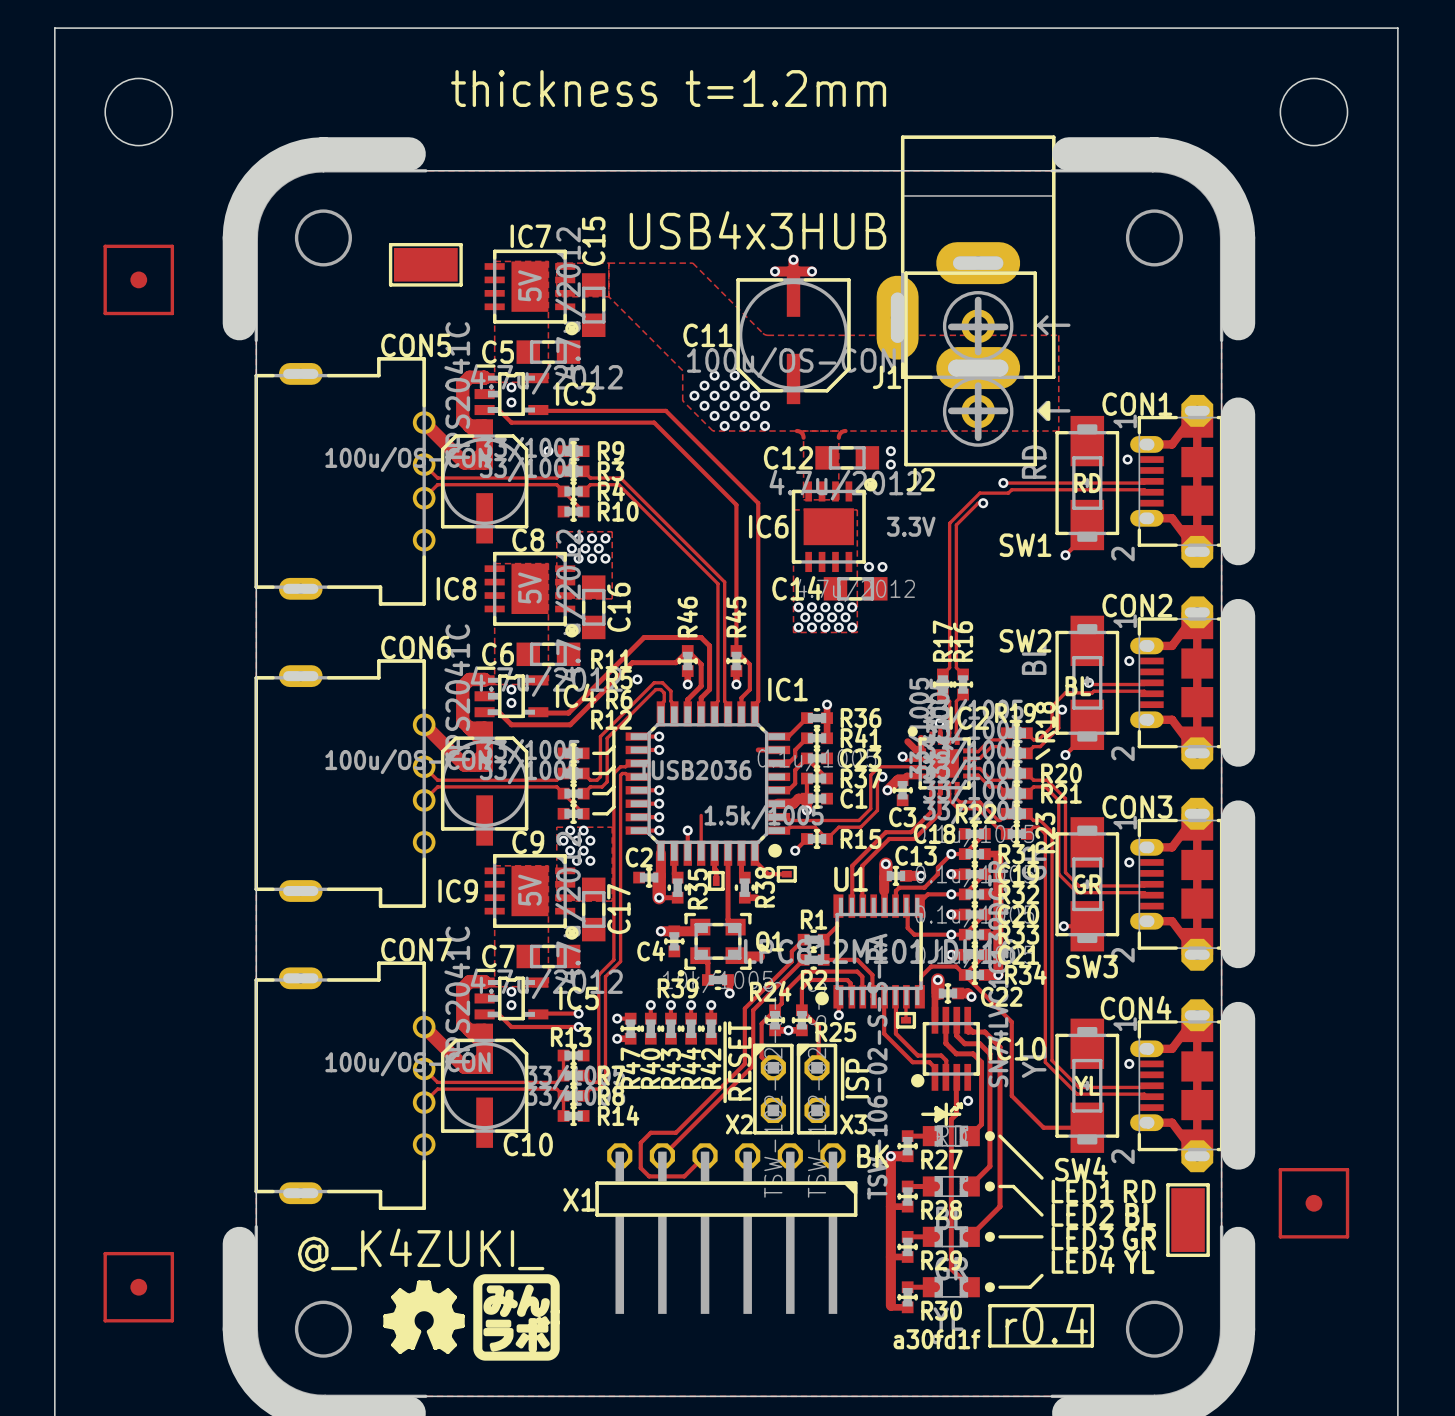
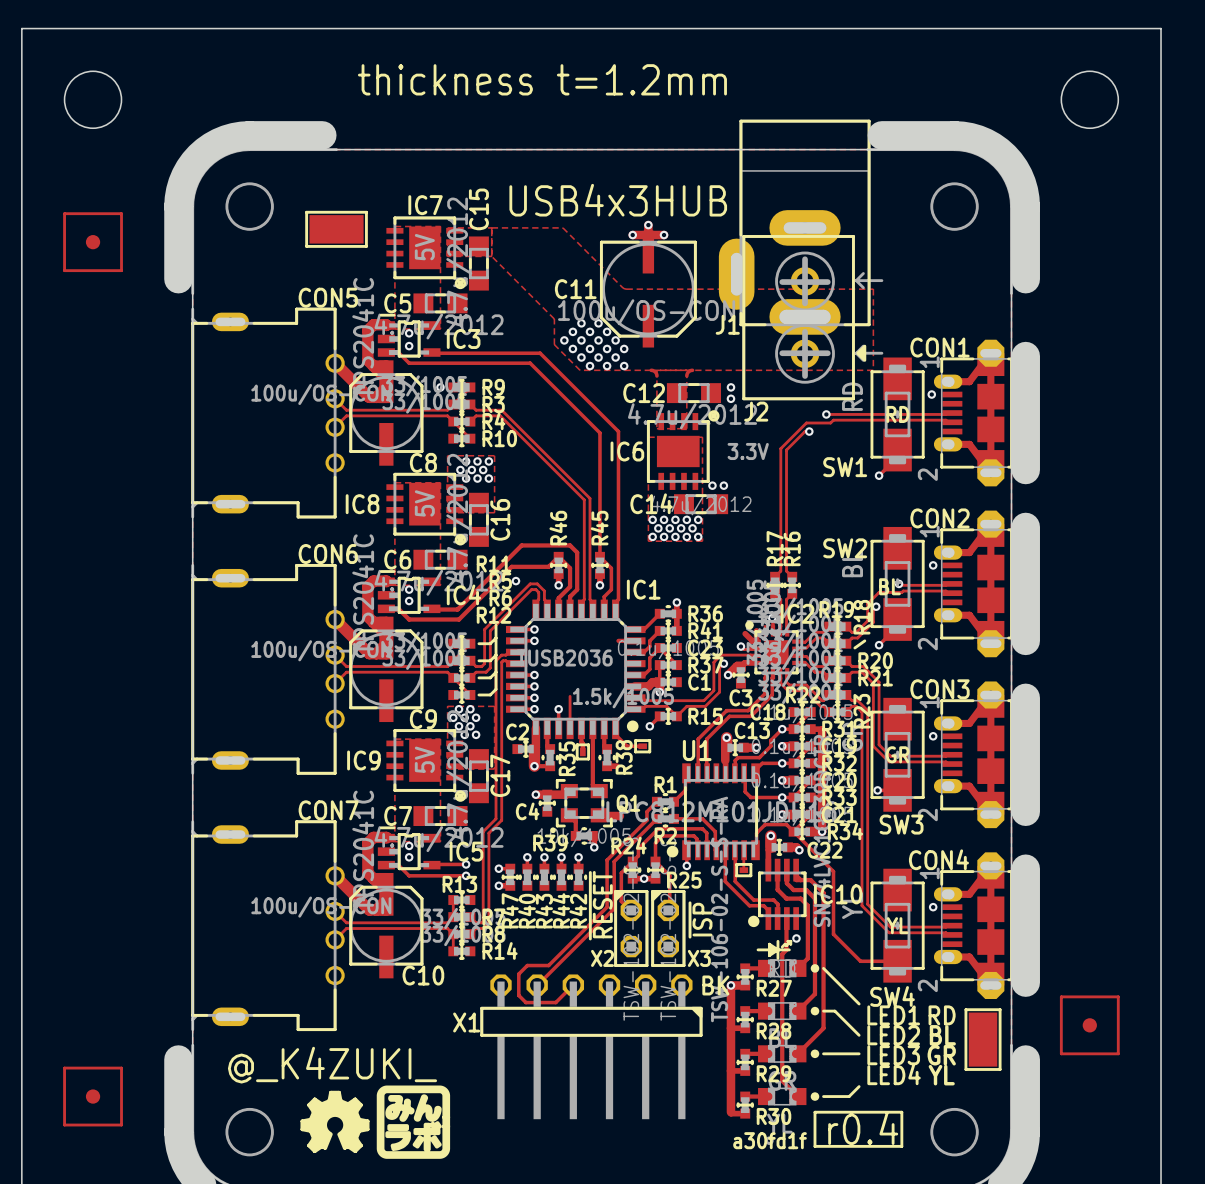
CON5 footprint: [254, 357, 436, 606] -> [191, 307, 345, 519]
CON6 footprint: [254, 659, 436, 908] -> [191, 563, 345, 775]
CON7 footprint: [254, 961, 436, 1210] -> [191, 820, 345, 1032]

